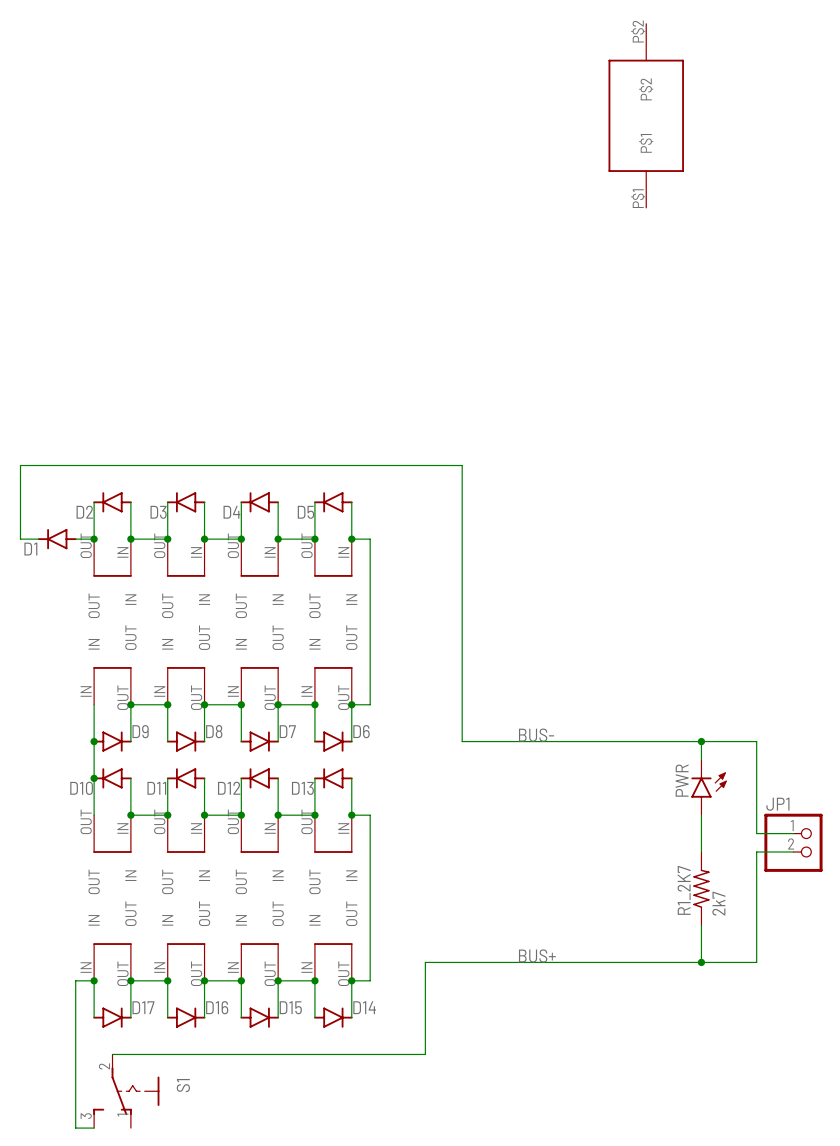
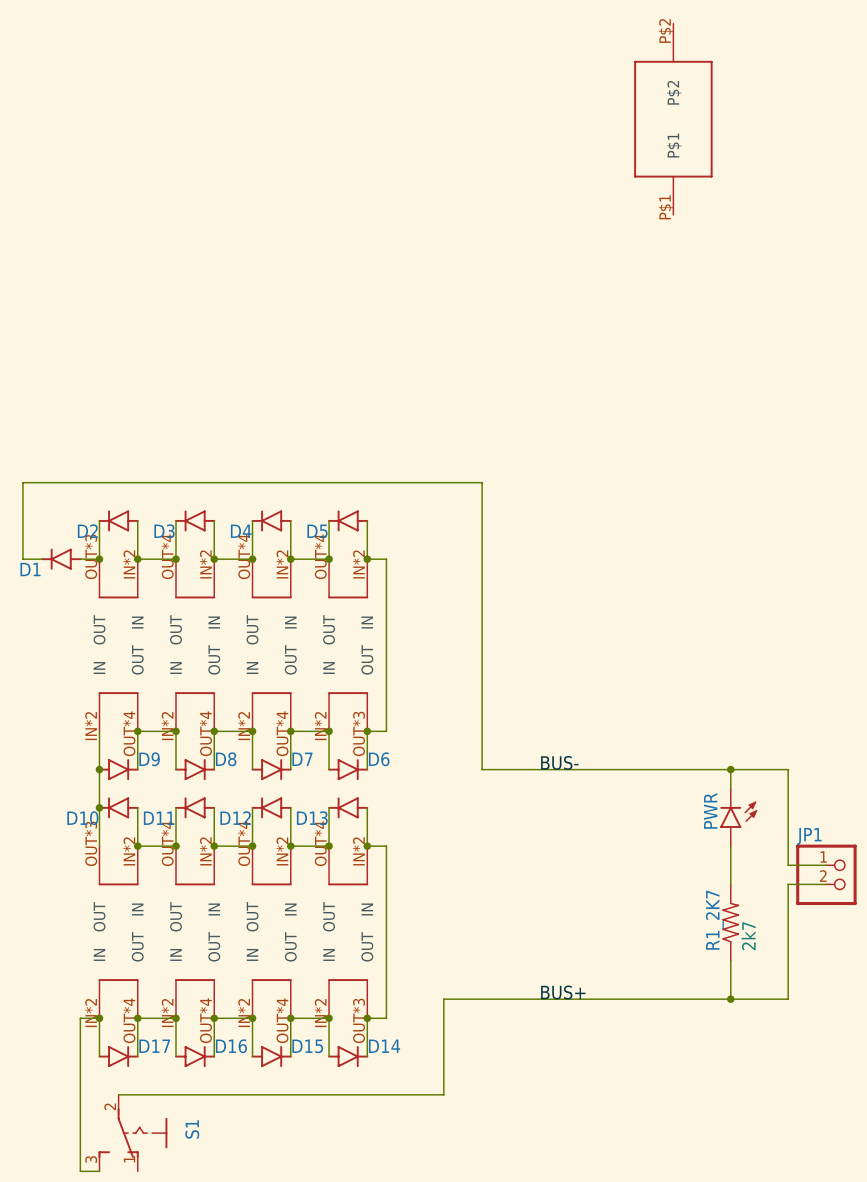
part pin number: OUT (86, 545) -> OUT*3 (91, 556)
part pin number: OUT (159, 545) -> OUT*4 (167, 556)
part pin number: OUT (233, 545) -> OUT*4 (244, 556)
part pin number: OUT (306, 545) -> OUT*4 (320, 556)
part pin number: IN (122, 552) -> IN*2 (129, 564)
part pin number: IN (196, 552) -> IN*2 (205, 564)
part pin number: IN (270, 552) -> IN*2 (282, 564)
part pin number: IN (343, 552) -> IN*2 (358, 564)
part pin number: IN (86, 691) -> IN*2 (91, 726)
part pin number: IN (159, 691) -> IN*2 (167, 726)
part pin number: IN (233, 691) -> IN*2 (244, 726)
part pin number: IN (306, 691) -> IN*2 (320, 726)
part pin number: OUT (122, 697) -> OUT*4 (129, 733)
part pin number: OUT (196, 697) -> OUT*4 (205, 733)
part pin number: OUT (270, 697) -> OUT*4 (282, 733)
part pin number: OUT (343, 697) -> OUT*3 (359, 733)
part pin number: OUT (86, 821) -> OUT*3 (91, 843)
part pin number: OUT (159, 821) -> OUT*4 (167, 843)
part pin number: OUT (233, 821) -> OUT*4 (244, 843)
part pin number: OUT (306, 821) -> OUT*4 (320, 843)
part pin number: IN (122, 828) -> IN*2 (129, 851)
part pin number: IN (196, 828) -> IN*2 (205, 851)
part pin number: IN (270, 828) -> IN*2 (282, 851)
part pin number: IN (343, 828) -> IN*2 (358, 851)
part pin number: IN (86, 967) -> IN*2 (91, 1013)
part pin number: IN (159, 967) -> IN*2 (167, 1013)
part pin number: IN (233, 967) -> IN*2 (244, 1013)
part pin number: IN (306, 967) -> IN*2 (320, 1013)
part pin number: OUT (122, 973) -> OUT*4 (129, 1020)
part pin number: OUT (196, 973) -> OUT*4 (205, 1020)
part pin number: OUT (270, 973) -> OUT*4 (282, 1020)
part pin number: OUT (343, 973) -> OUT*3 (359, 1020)

